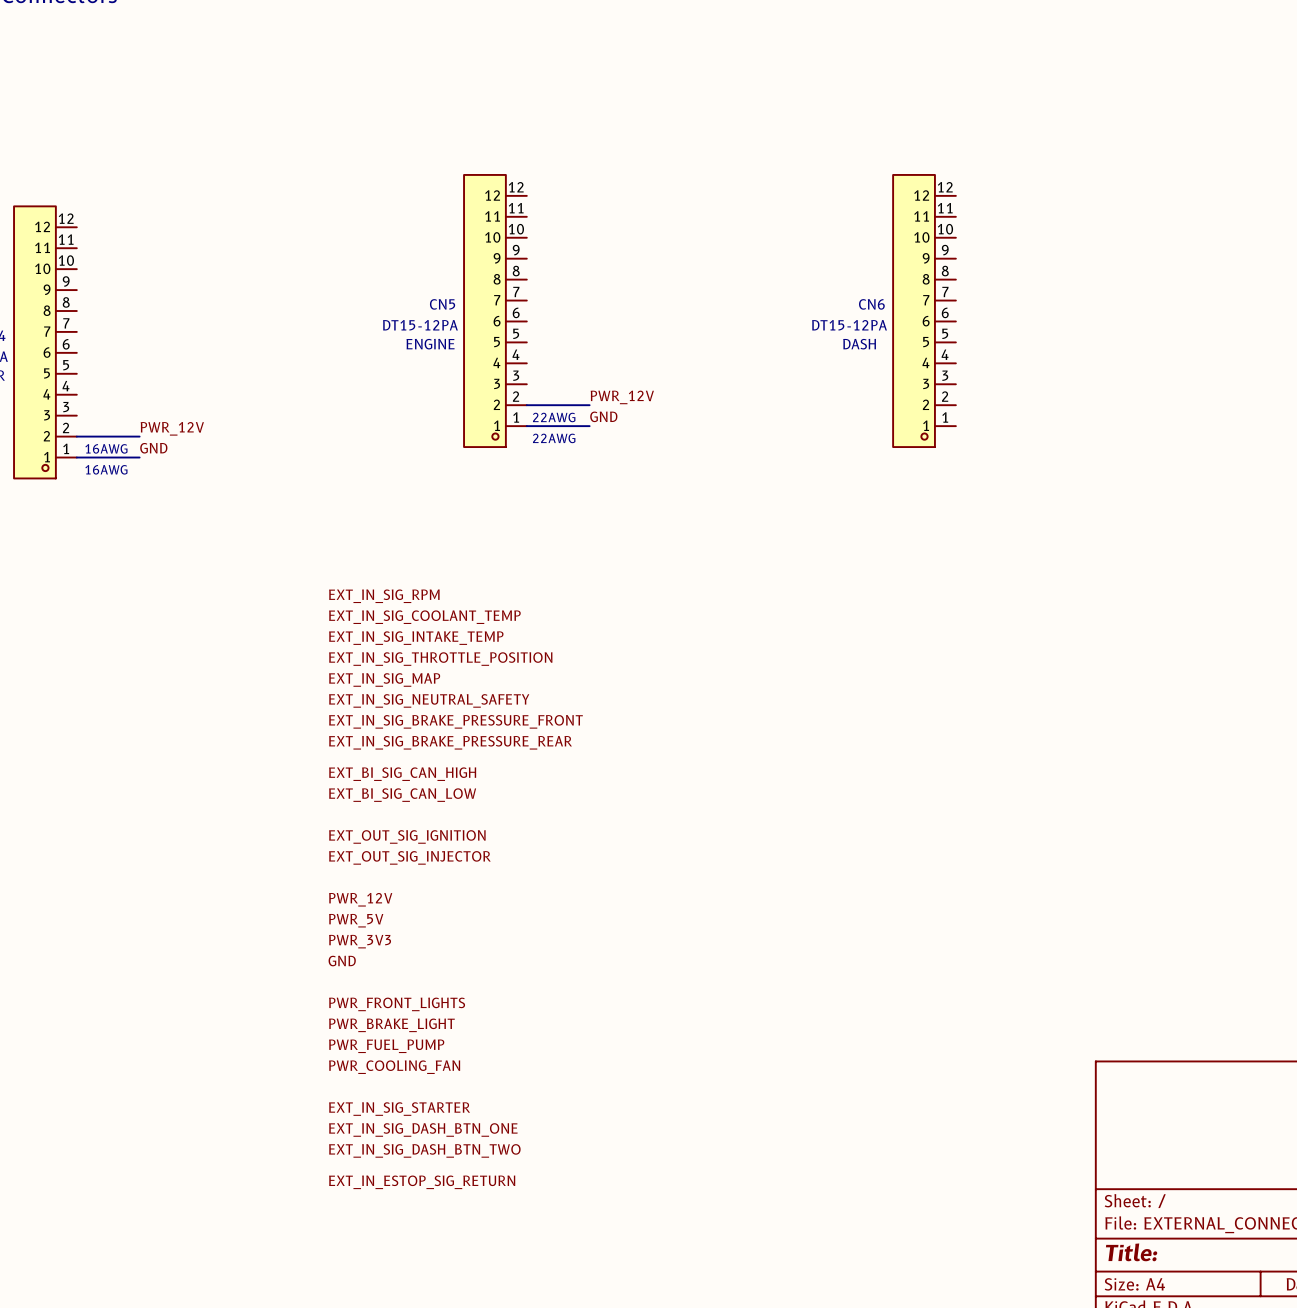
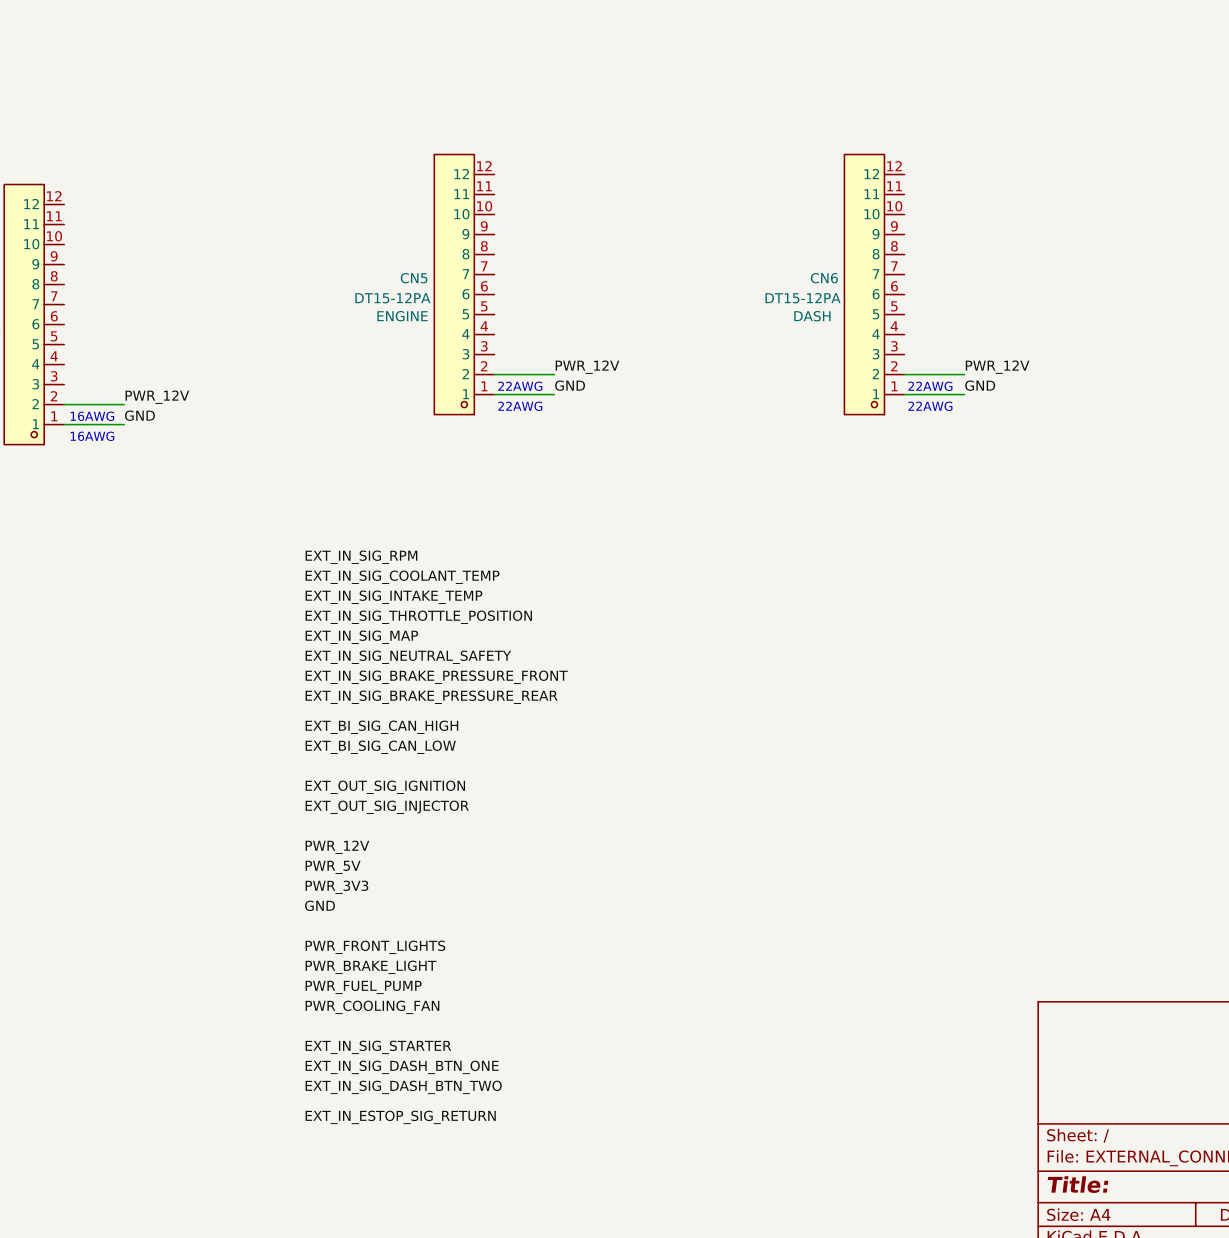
label: none -> PWR_12V (997, 367)
wire: none -> (904, 374) (964, 374)
label: none -> GND (980, 385)
text: none -> 22AWG (930, 386)
wire: none -> (904, 394) (964, 394)
text: none -> 22AWG (930, 406)

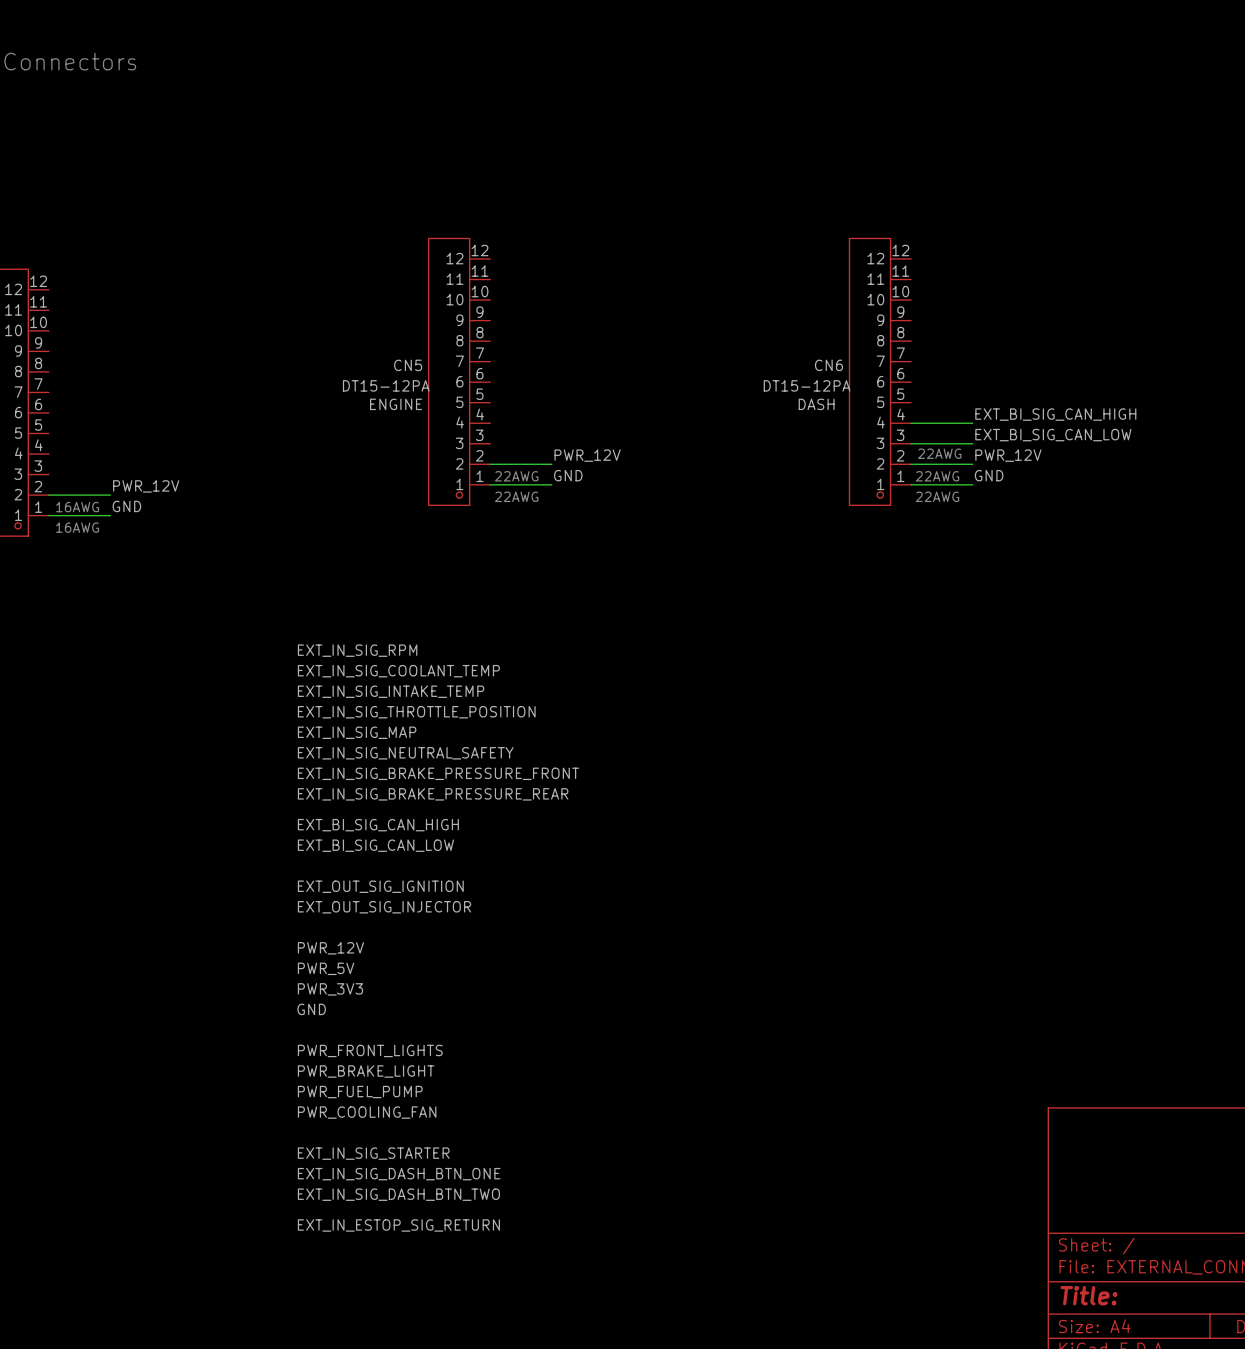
label: none -> EXT_BI_SIG_CAN_HIGH (1055, 414)
wire: none -> (911, 423) (972, 423)
label: none -> EXT_BI_SIG_CAN_LOW (1053, 435)
wire: none -> (911, 443) (972, 443)
text: none -> 22AWG (939, 453)

